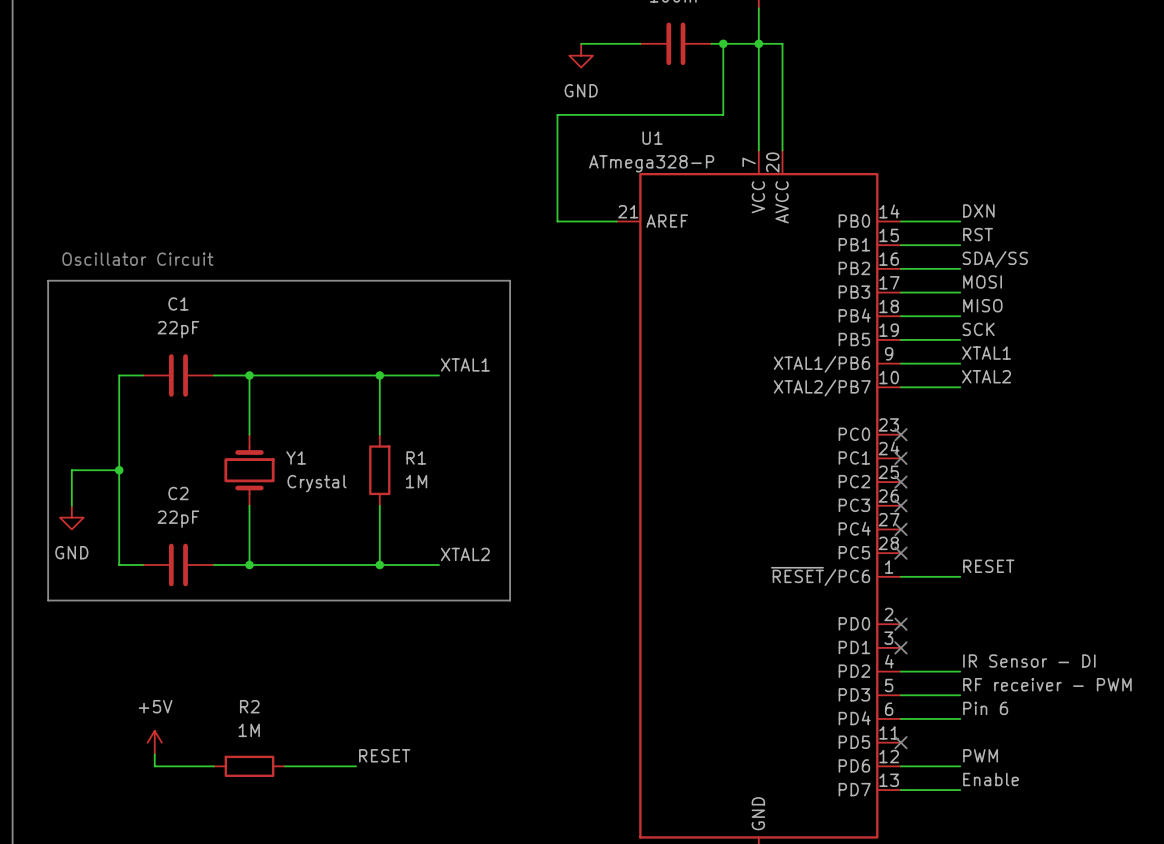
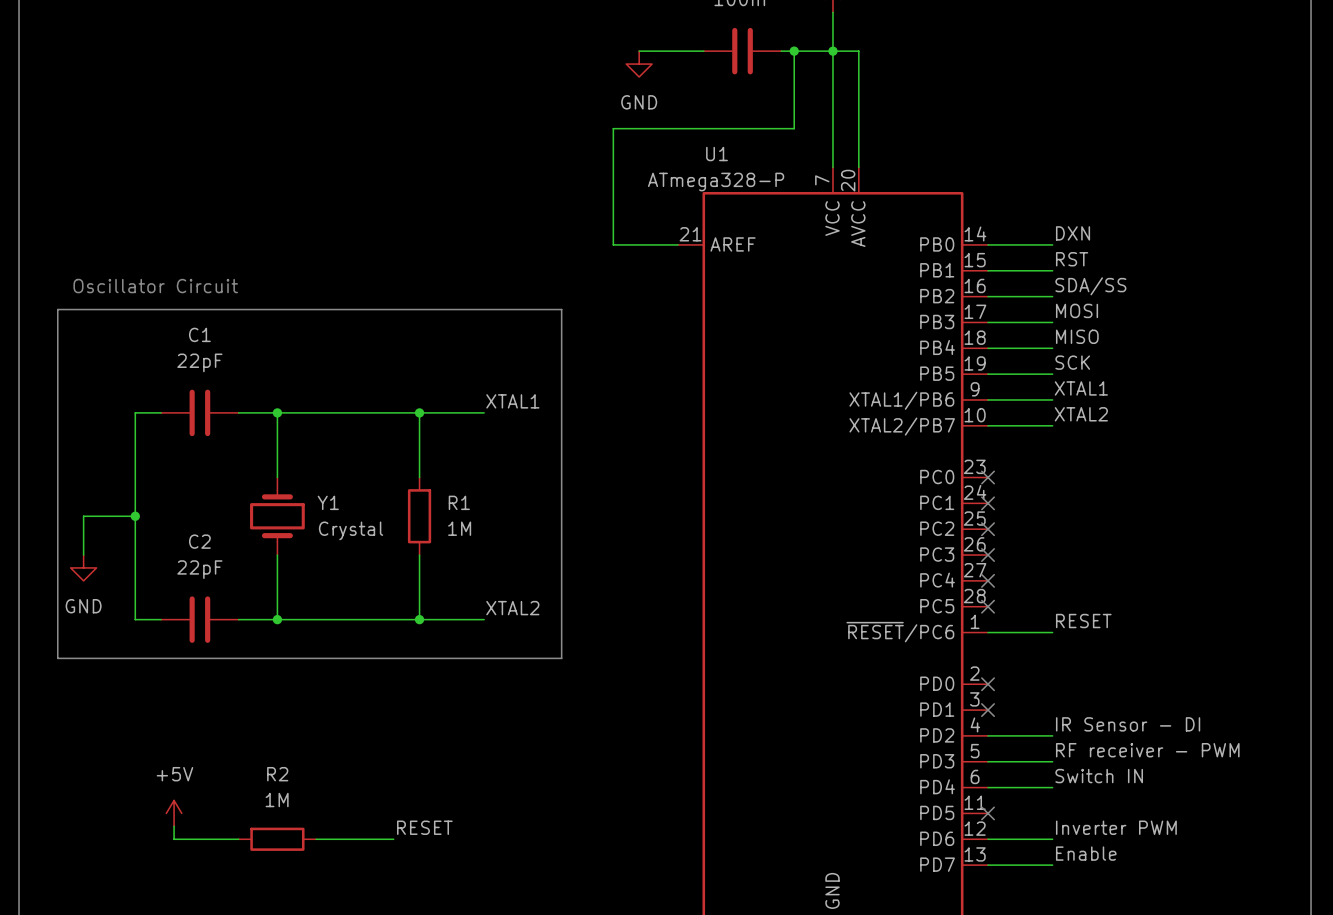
label: Pin 6 (985, 708) -> Switch IN (1099, 776)
label: PWM (980, 755) -> Inverter PWM (1116, 827)

